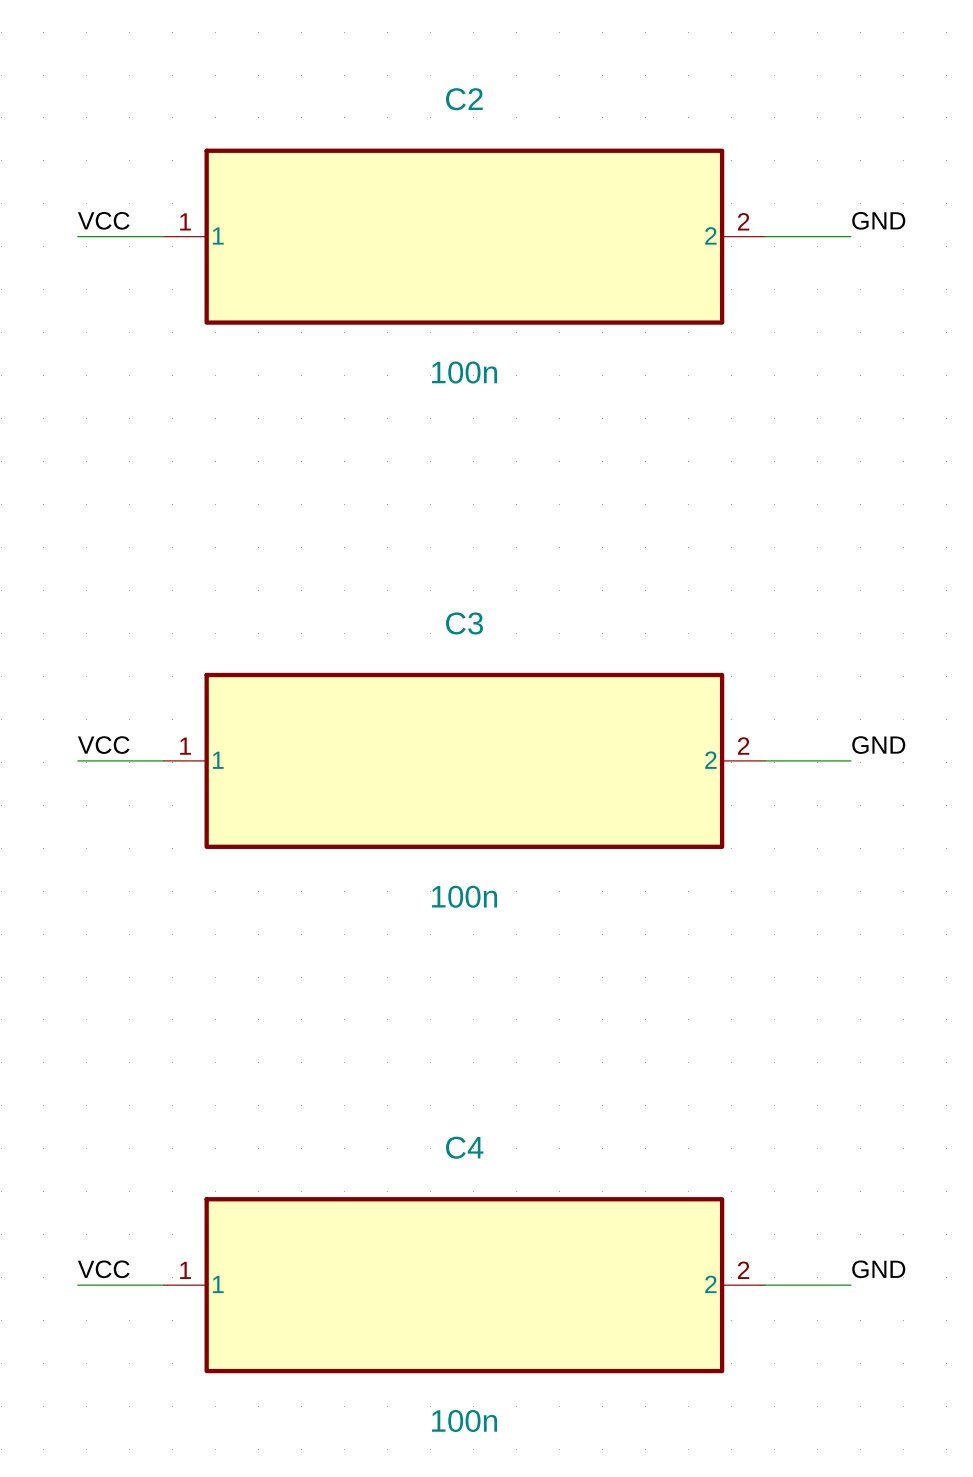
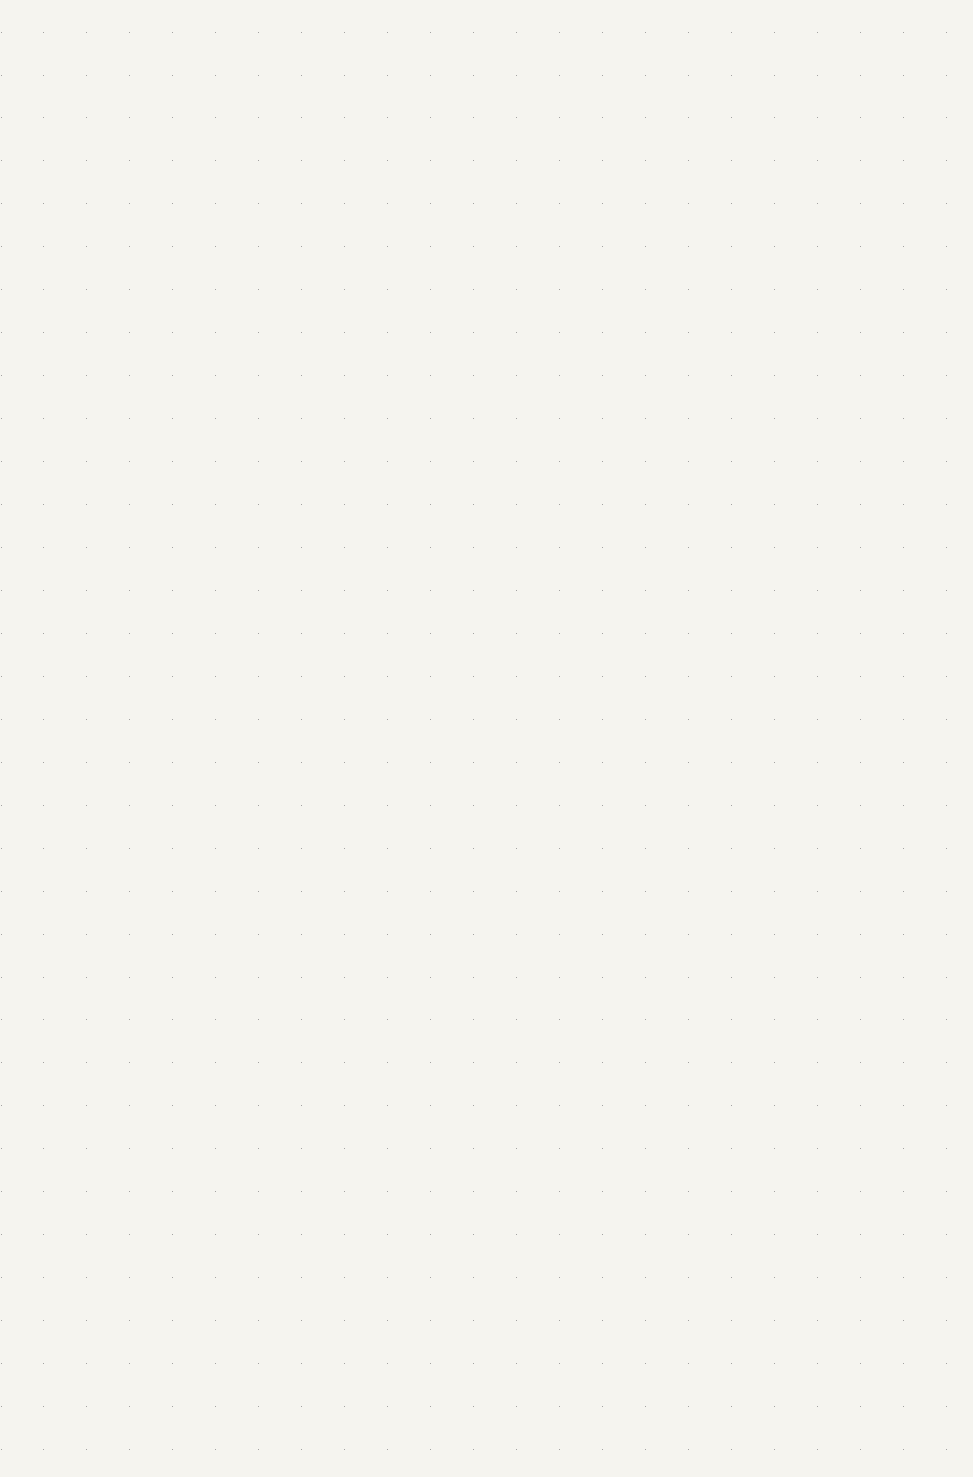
label: VCC (103, 220) -> none
label: GND (878, 220) -> none
wire: (77, 236) (163, 236) -> none
C2: 100n (464, 236) -> none
wire: (765, 236) (850, 236) -> none
label: VCC (103, 745) -> none
label: GND (878, 745) -> none
wire: (77, 760) (163, 760) -> none
C3: 100n (464, 760) -> none
wire: (765, 760) (850, 760) -> none
label: VCC (103, 1269) -> none
label: GND (878, 1269) -> none
wire: (77, 1285) (163, 1285) -> none
C4: 100n (464, 1285) -> none
wire: (765, 1285) (850, 1285) -> none

